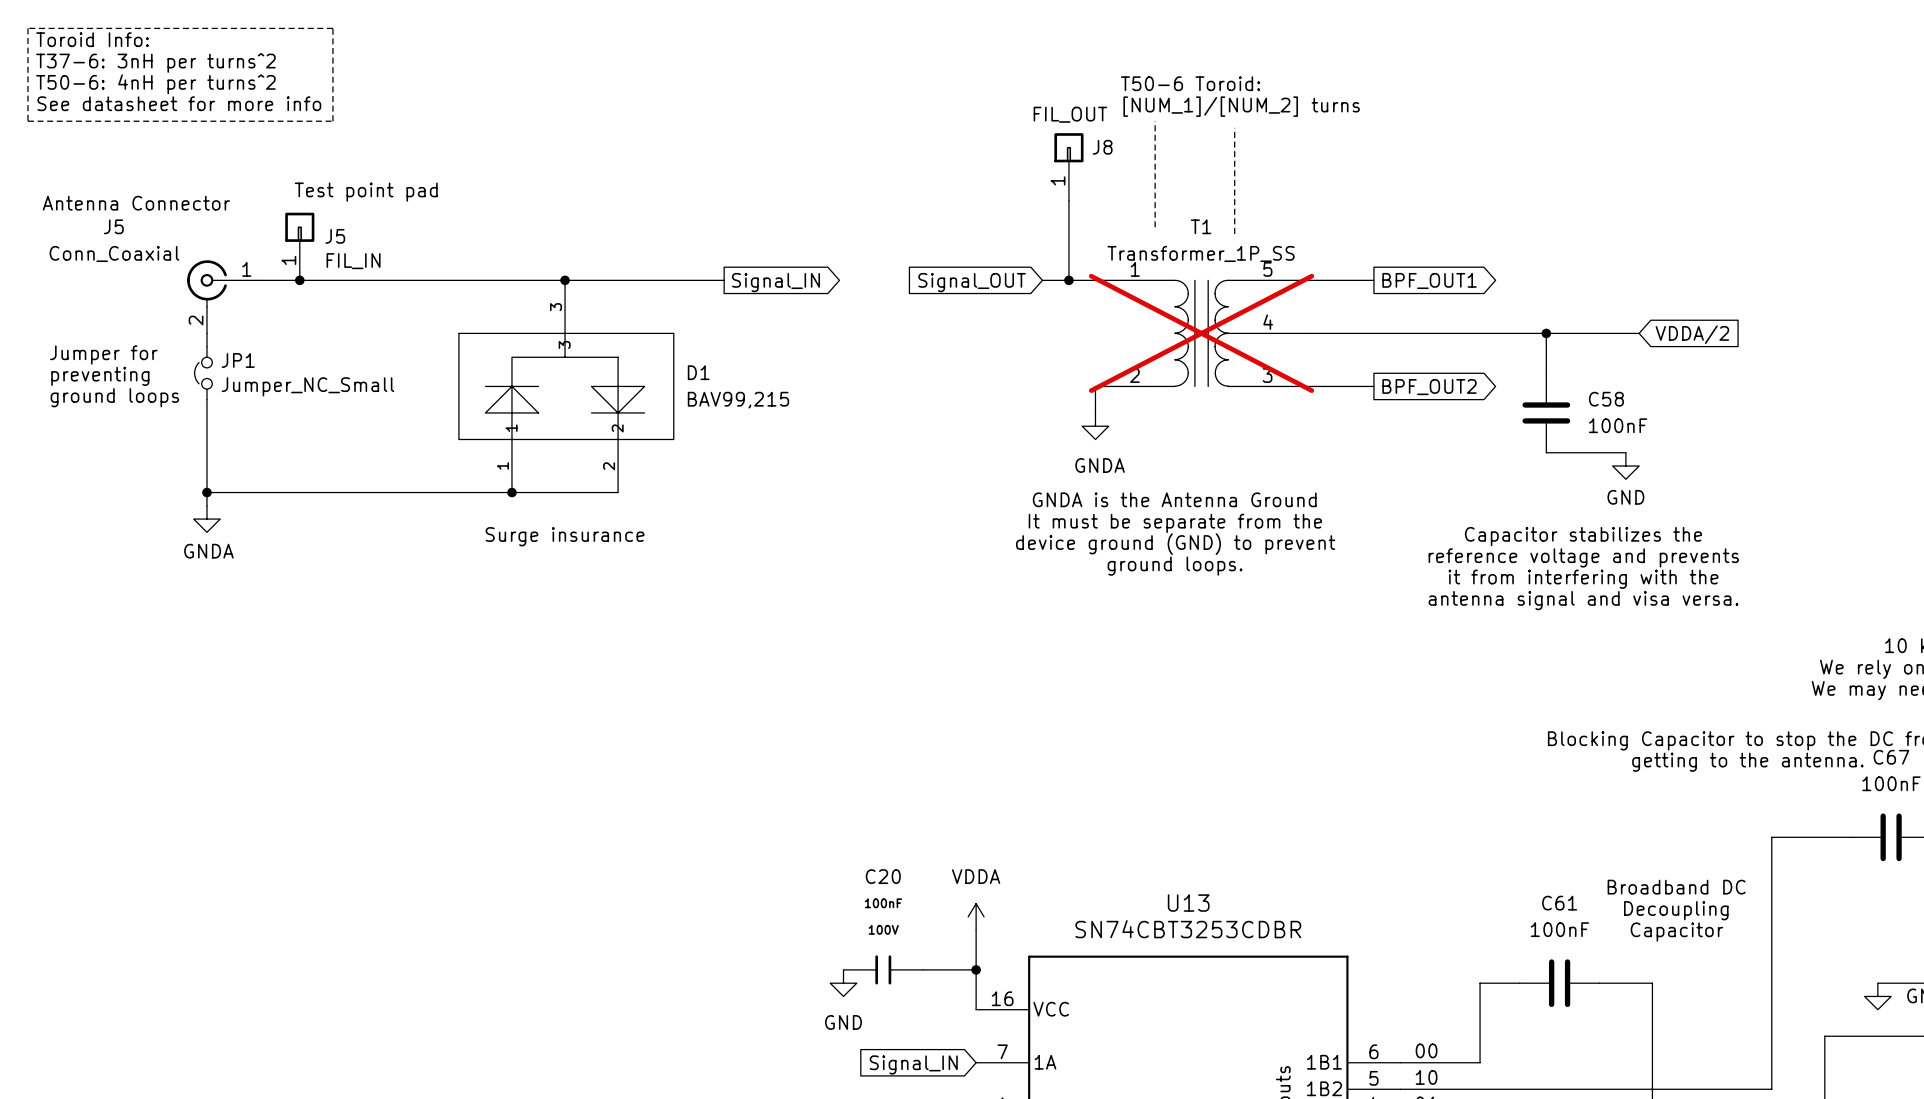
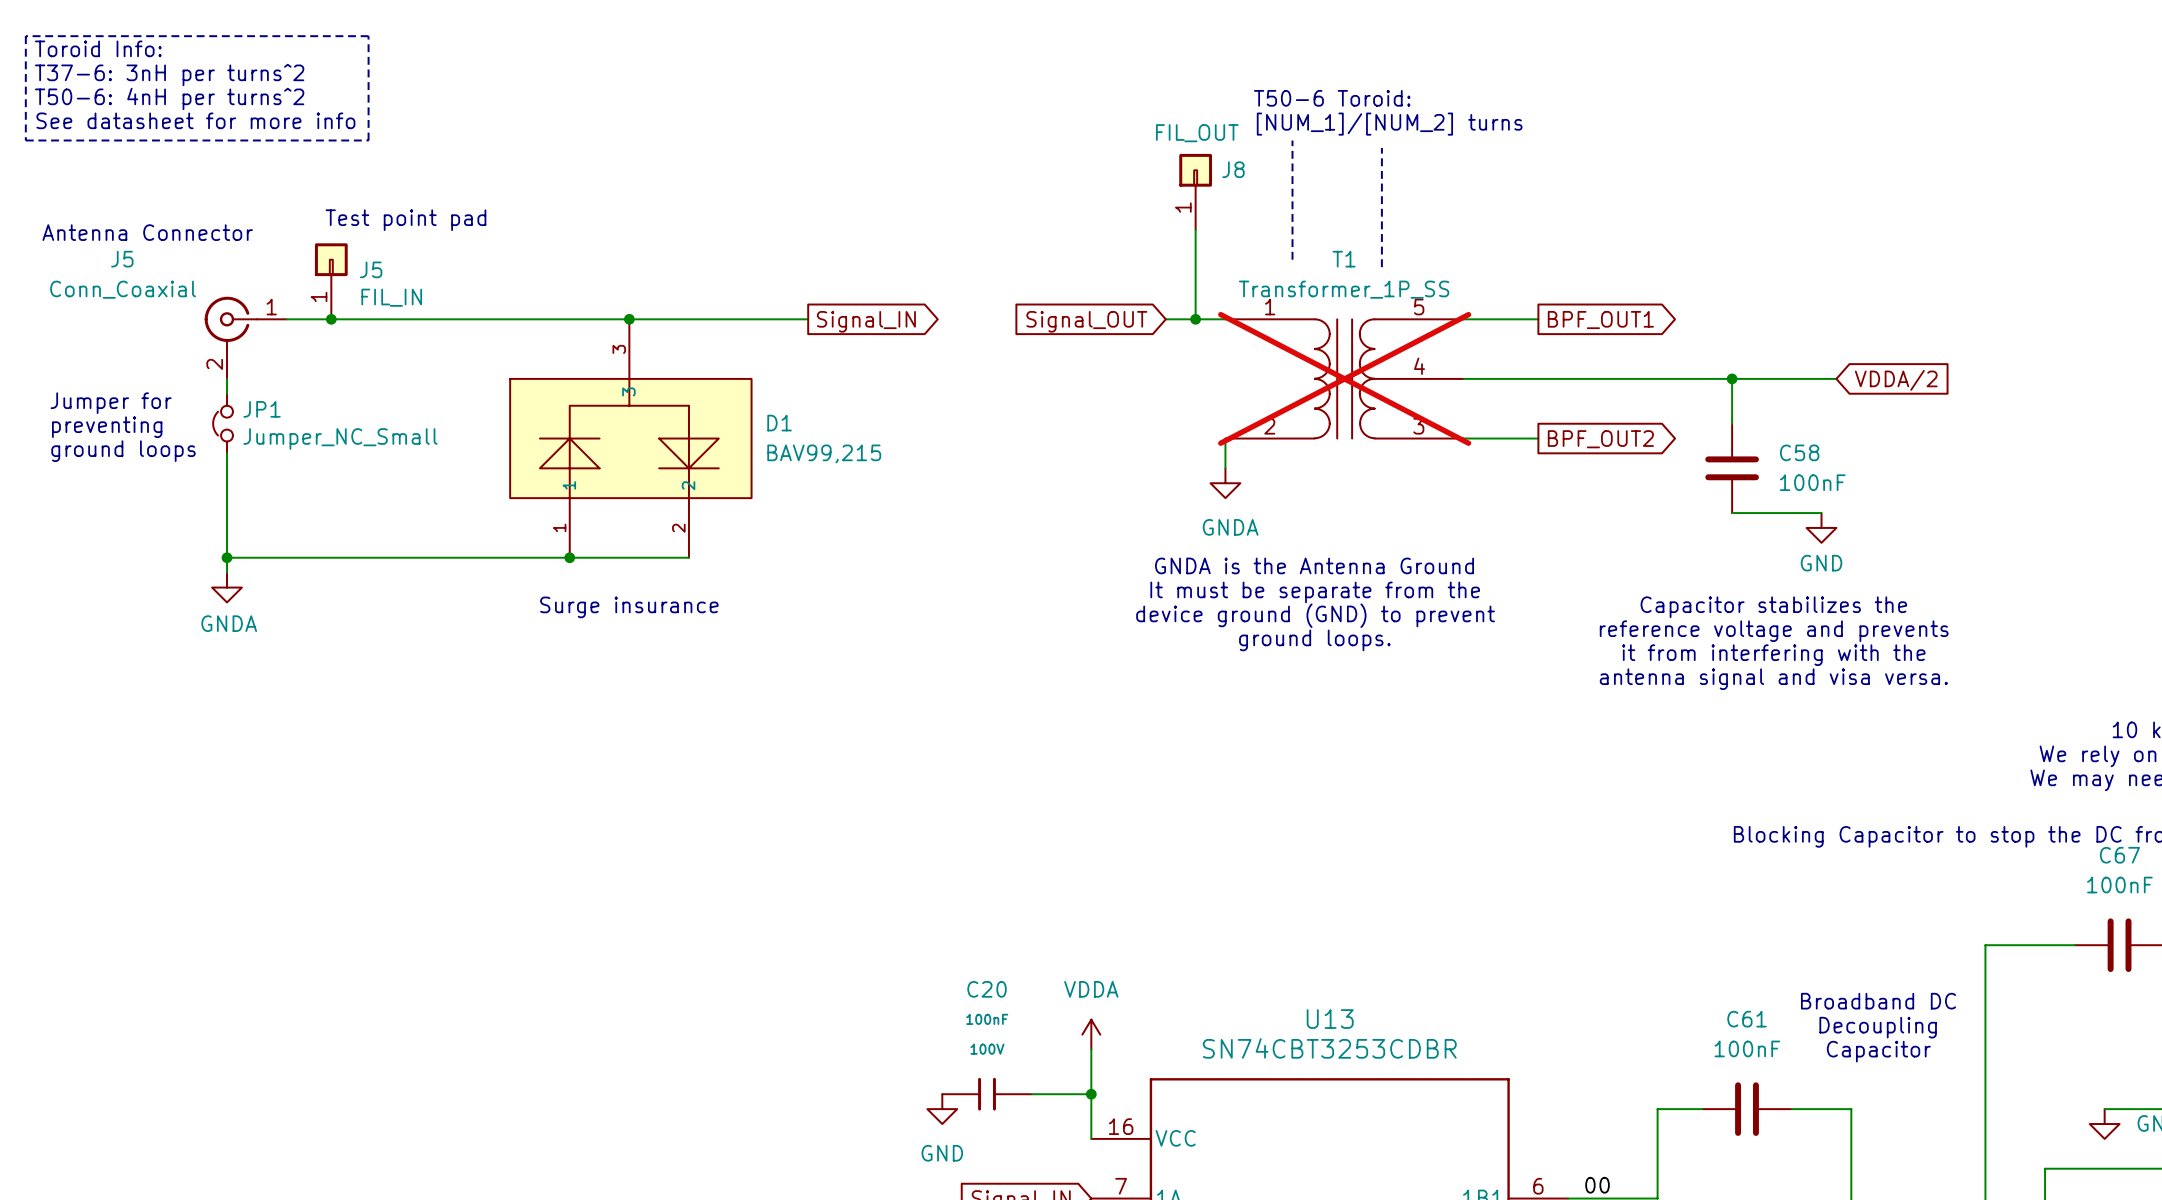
text: getting to the antenna. (1747, 762) -> none

